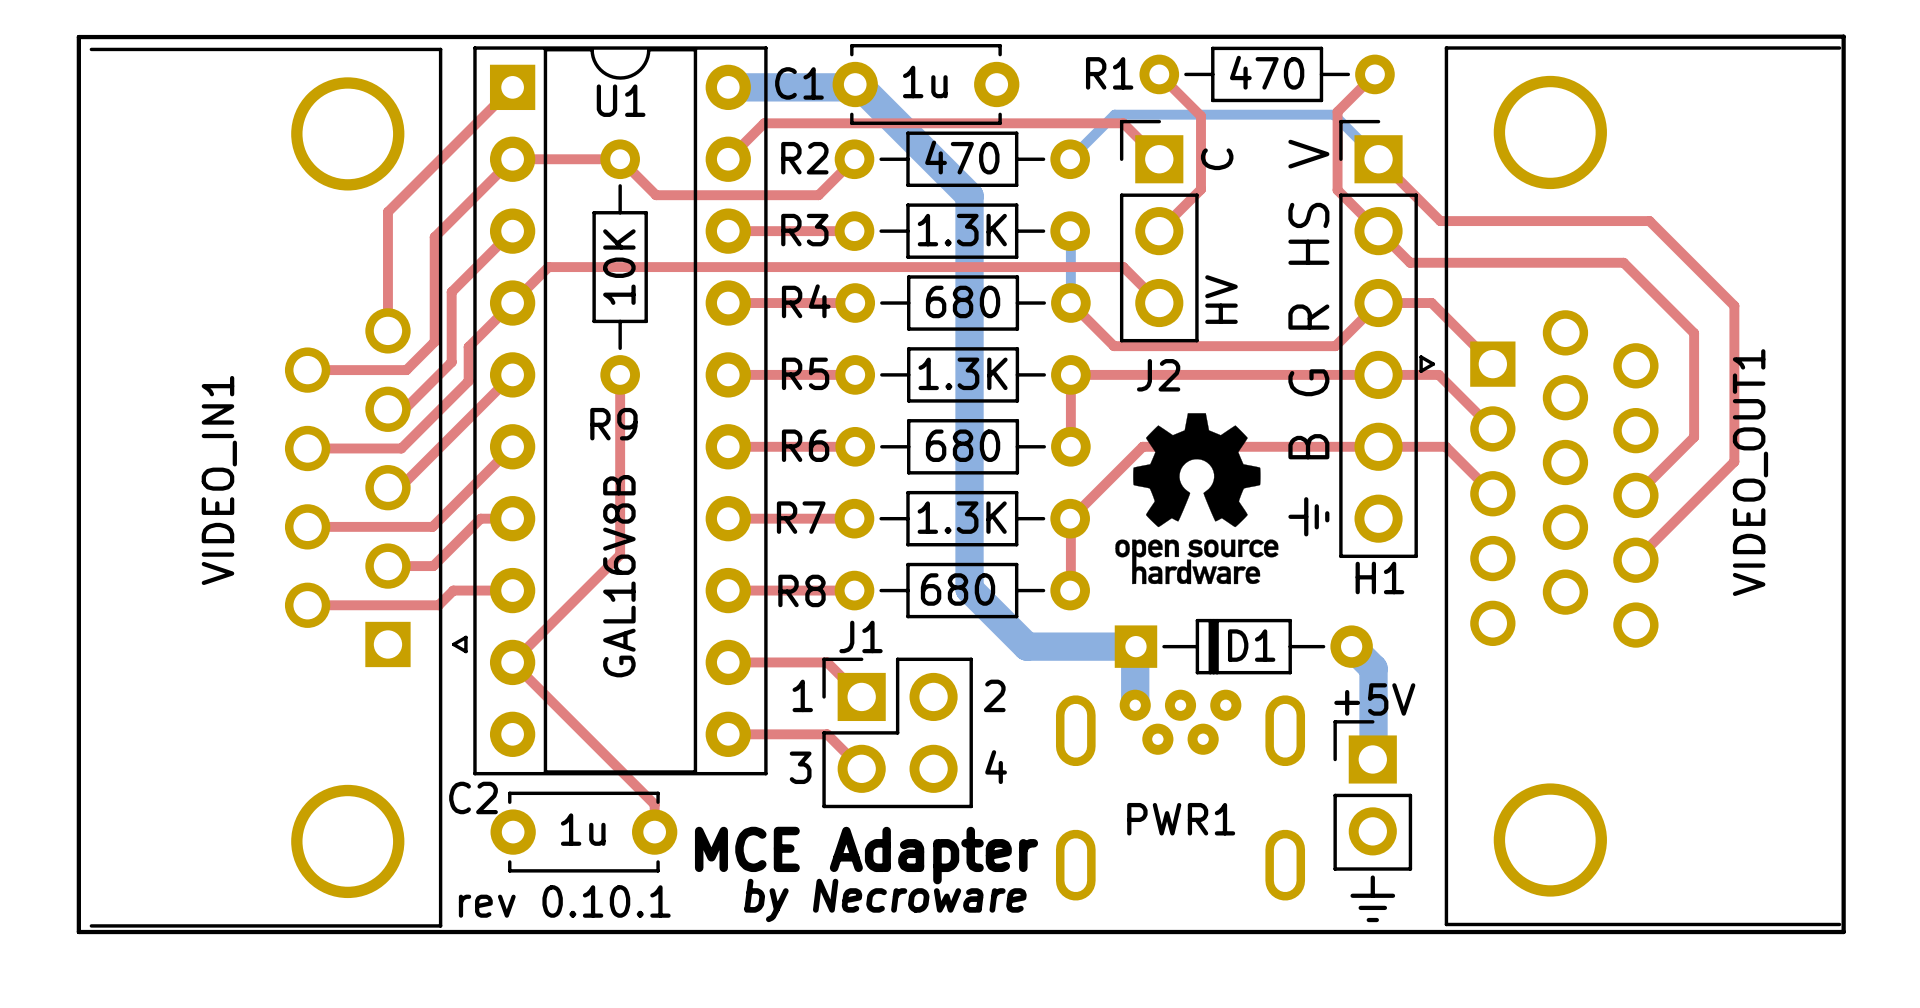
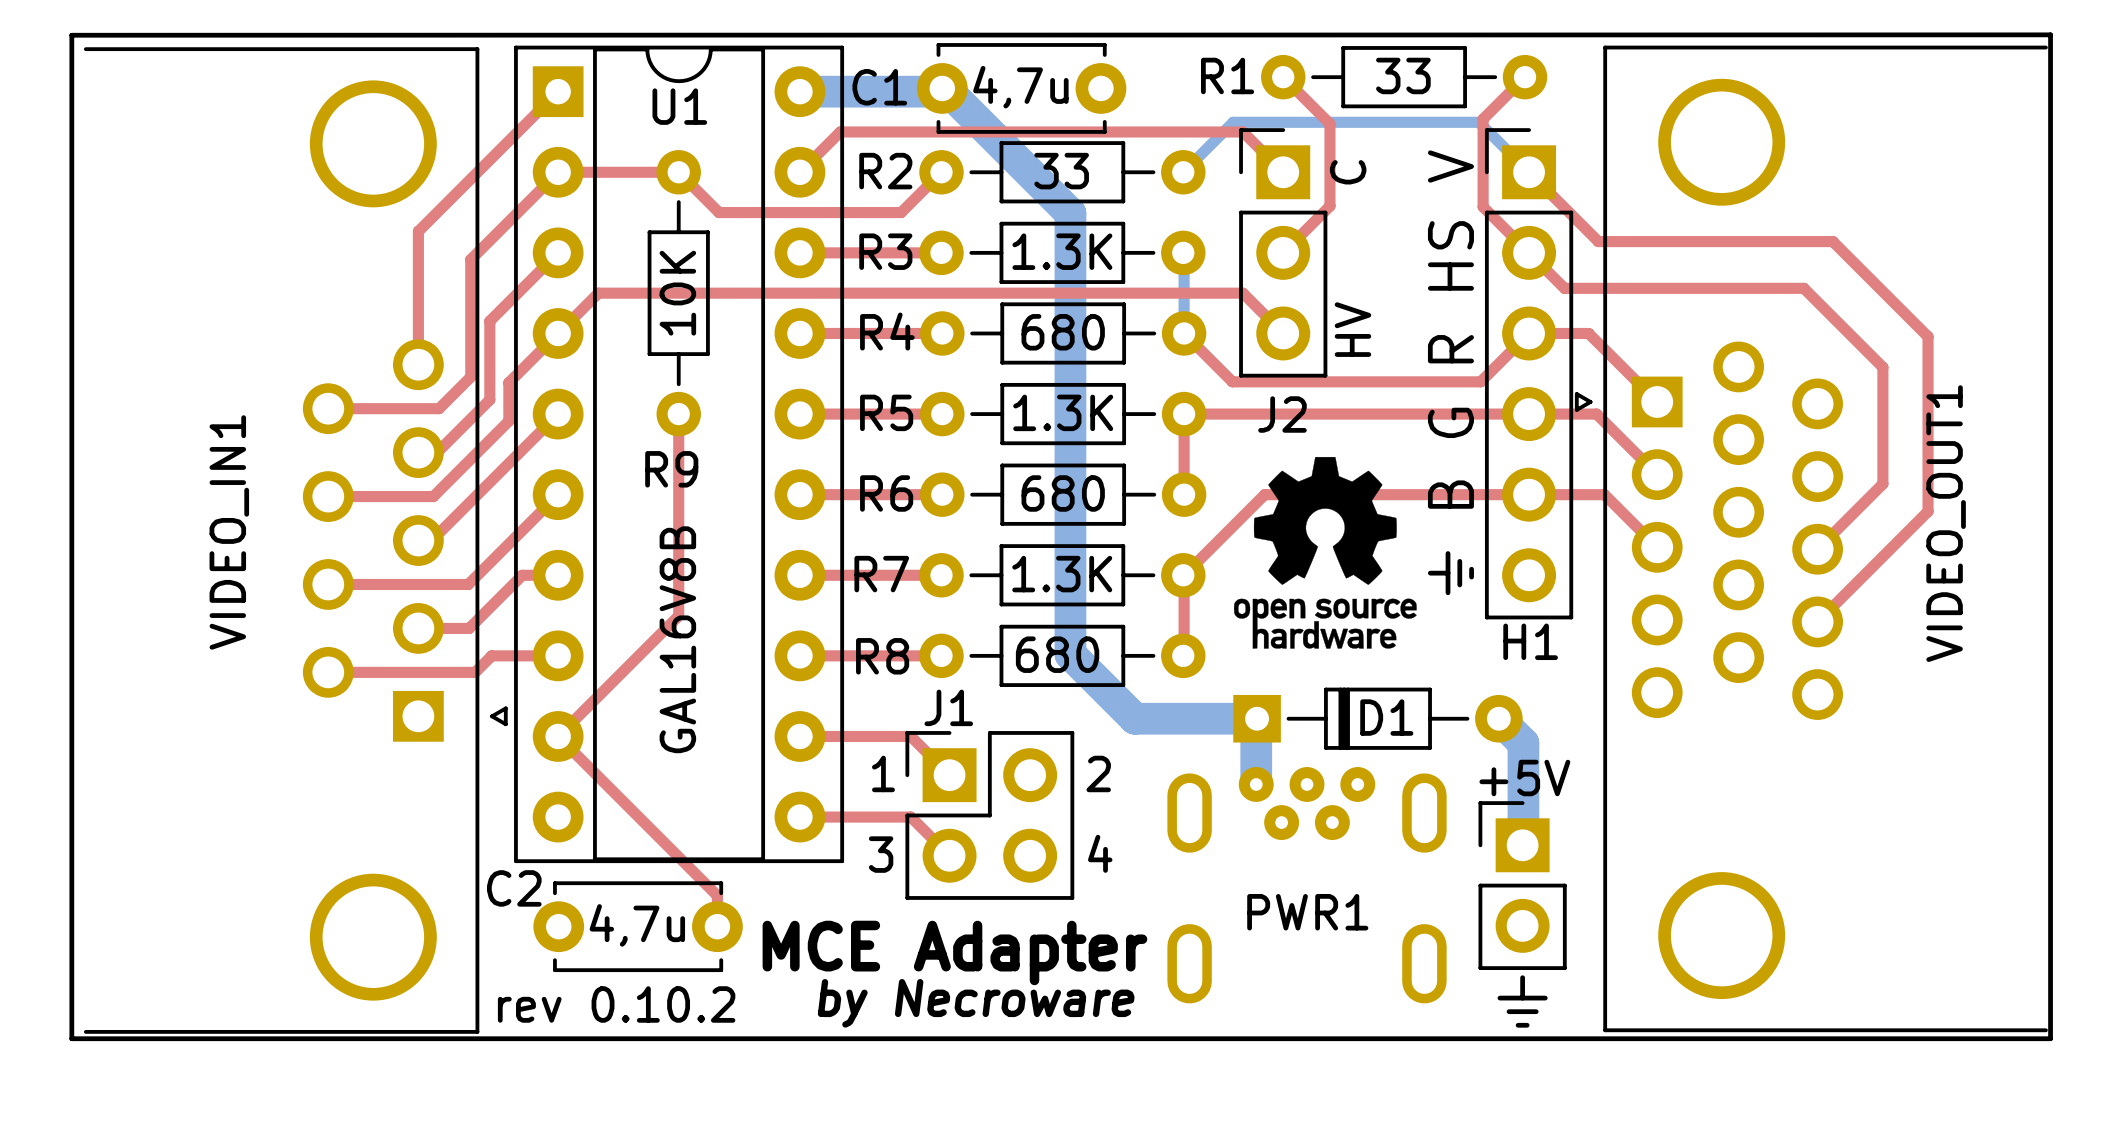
R1 value: 470 (1267, 72) -> 33 (1403, 75)
C1 value: 1u (925, 81) -> 4,7u (1020, 87)
R2 value: 470 (962, 157) -> 33 (1061, 171)
C2 value: 1u (583, 829) -> 4,7u (637, 925)
text: rev 0.10.1 (564, 901) -> rev 0.10.2 (616, 1004)

